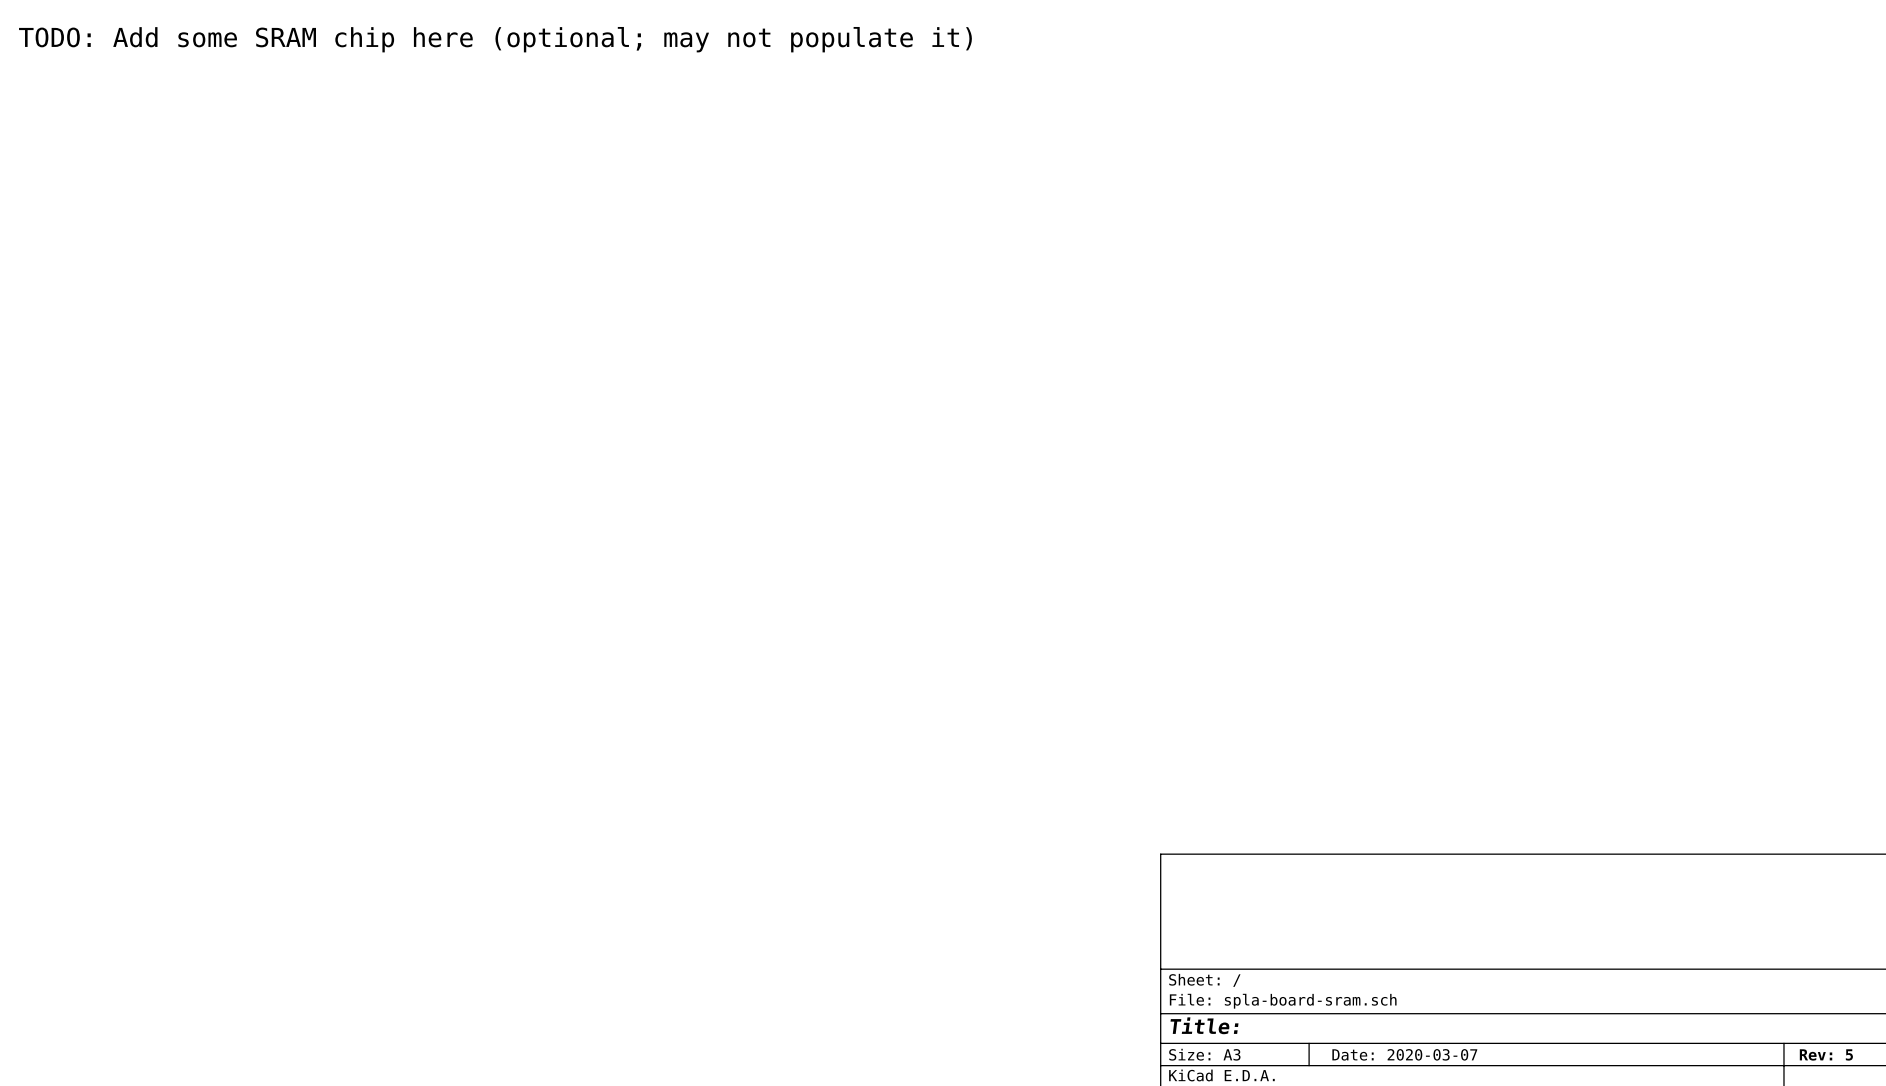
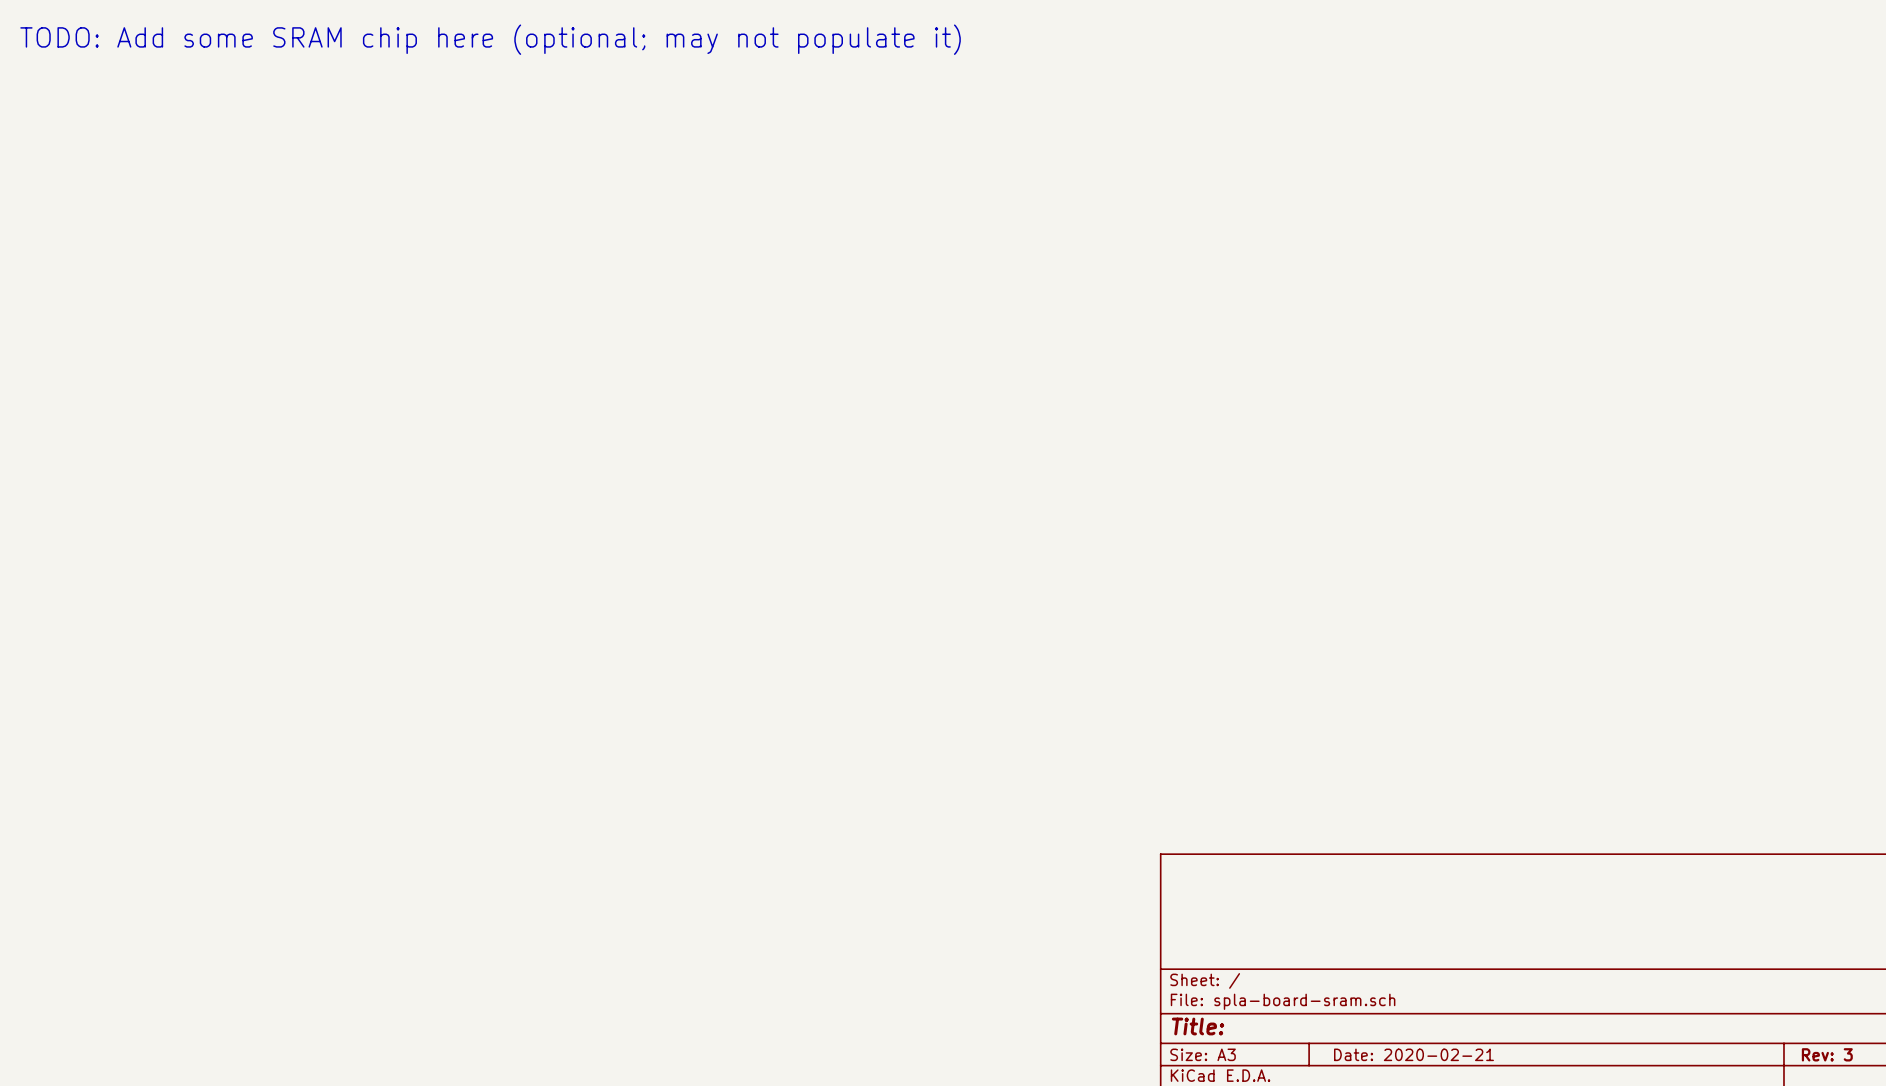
title block: Date: 2020-03-07 (1404, 1054) -> Date: 2020-02-21 (1413, 1054)
title block: Rev: 5 (1826, 1054) -> Rev: 3 (1827, 1054)

